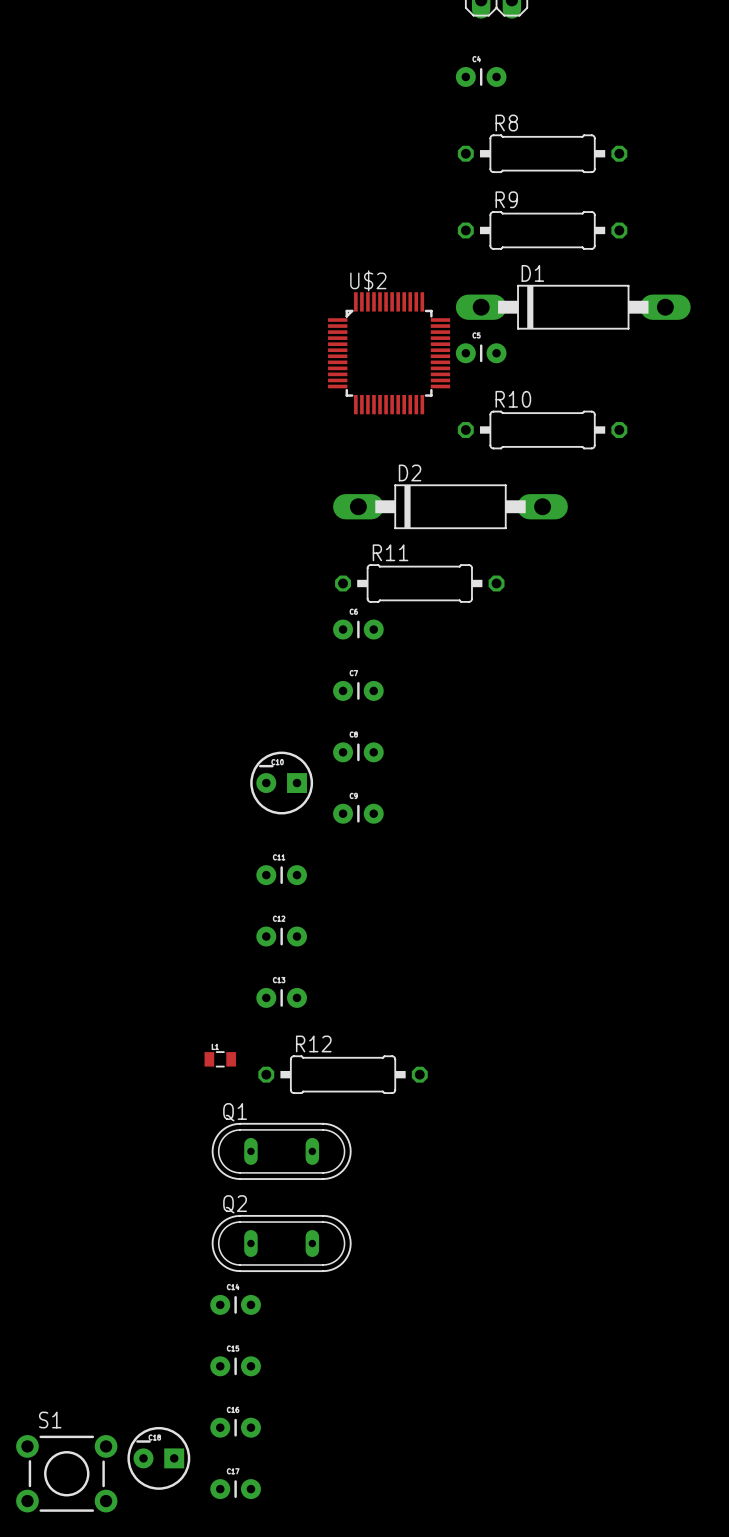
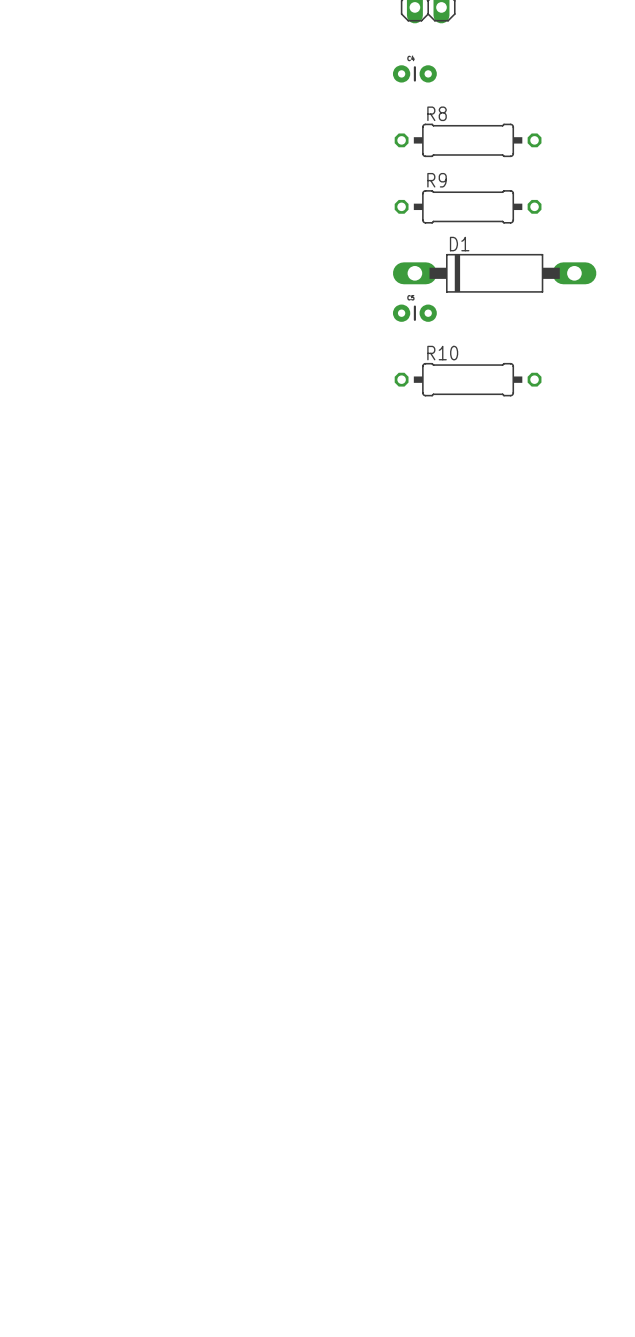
U$2: (389, 353) -> none
D2: (450, 506) -> none
R11: (419, 583) -> none
part: (358, 629) -> none
part: (358, 690) -> none
part: (358, 752) -> none
part: (281, 783) -> none
part: (358, 813) -> none
part: (281, 875) -> none
part: (281, 936) -> none
part: (281, 997) -> none
part: (220, 1059) -> none
R12: (343, 1074) -> none
Q1: (281, 1151) -> none
Q2: (281, 1243) -> none
part: (235, 1304) -> none
part: (235, 1366) -> none
part: (235, 1427) -> none
part: (158, 1458) -> none
S1: (66, 1473) -> none
part: (235, 1489) -> none

